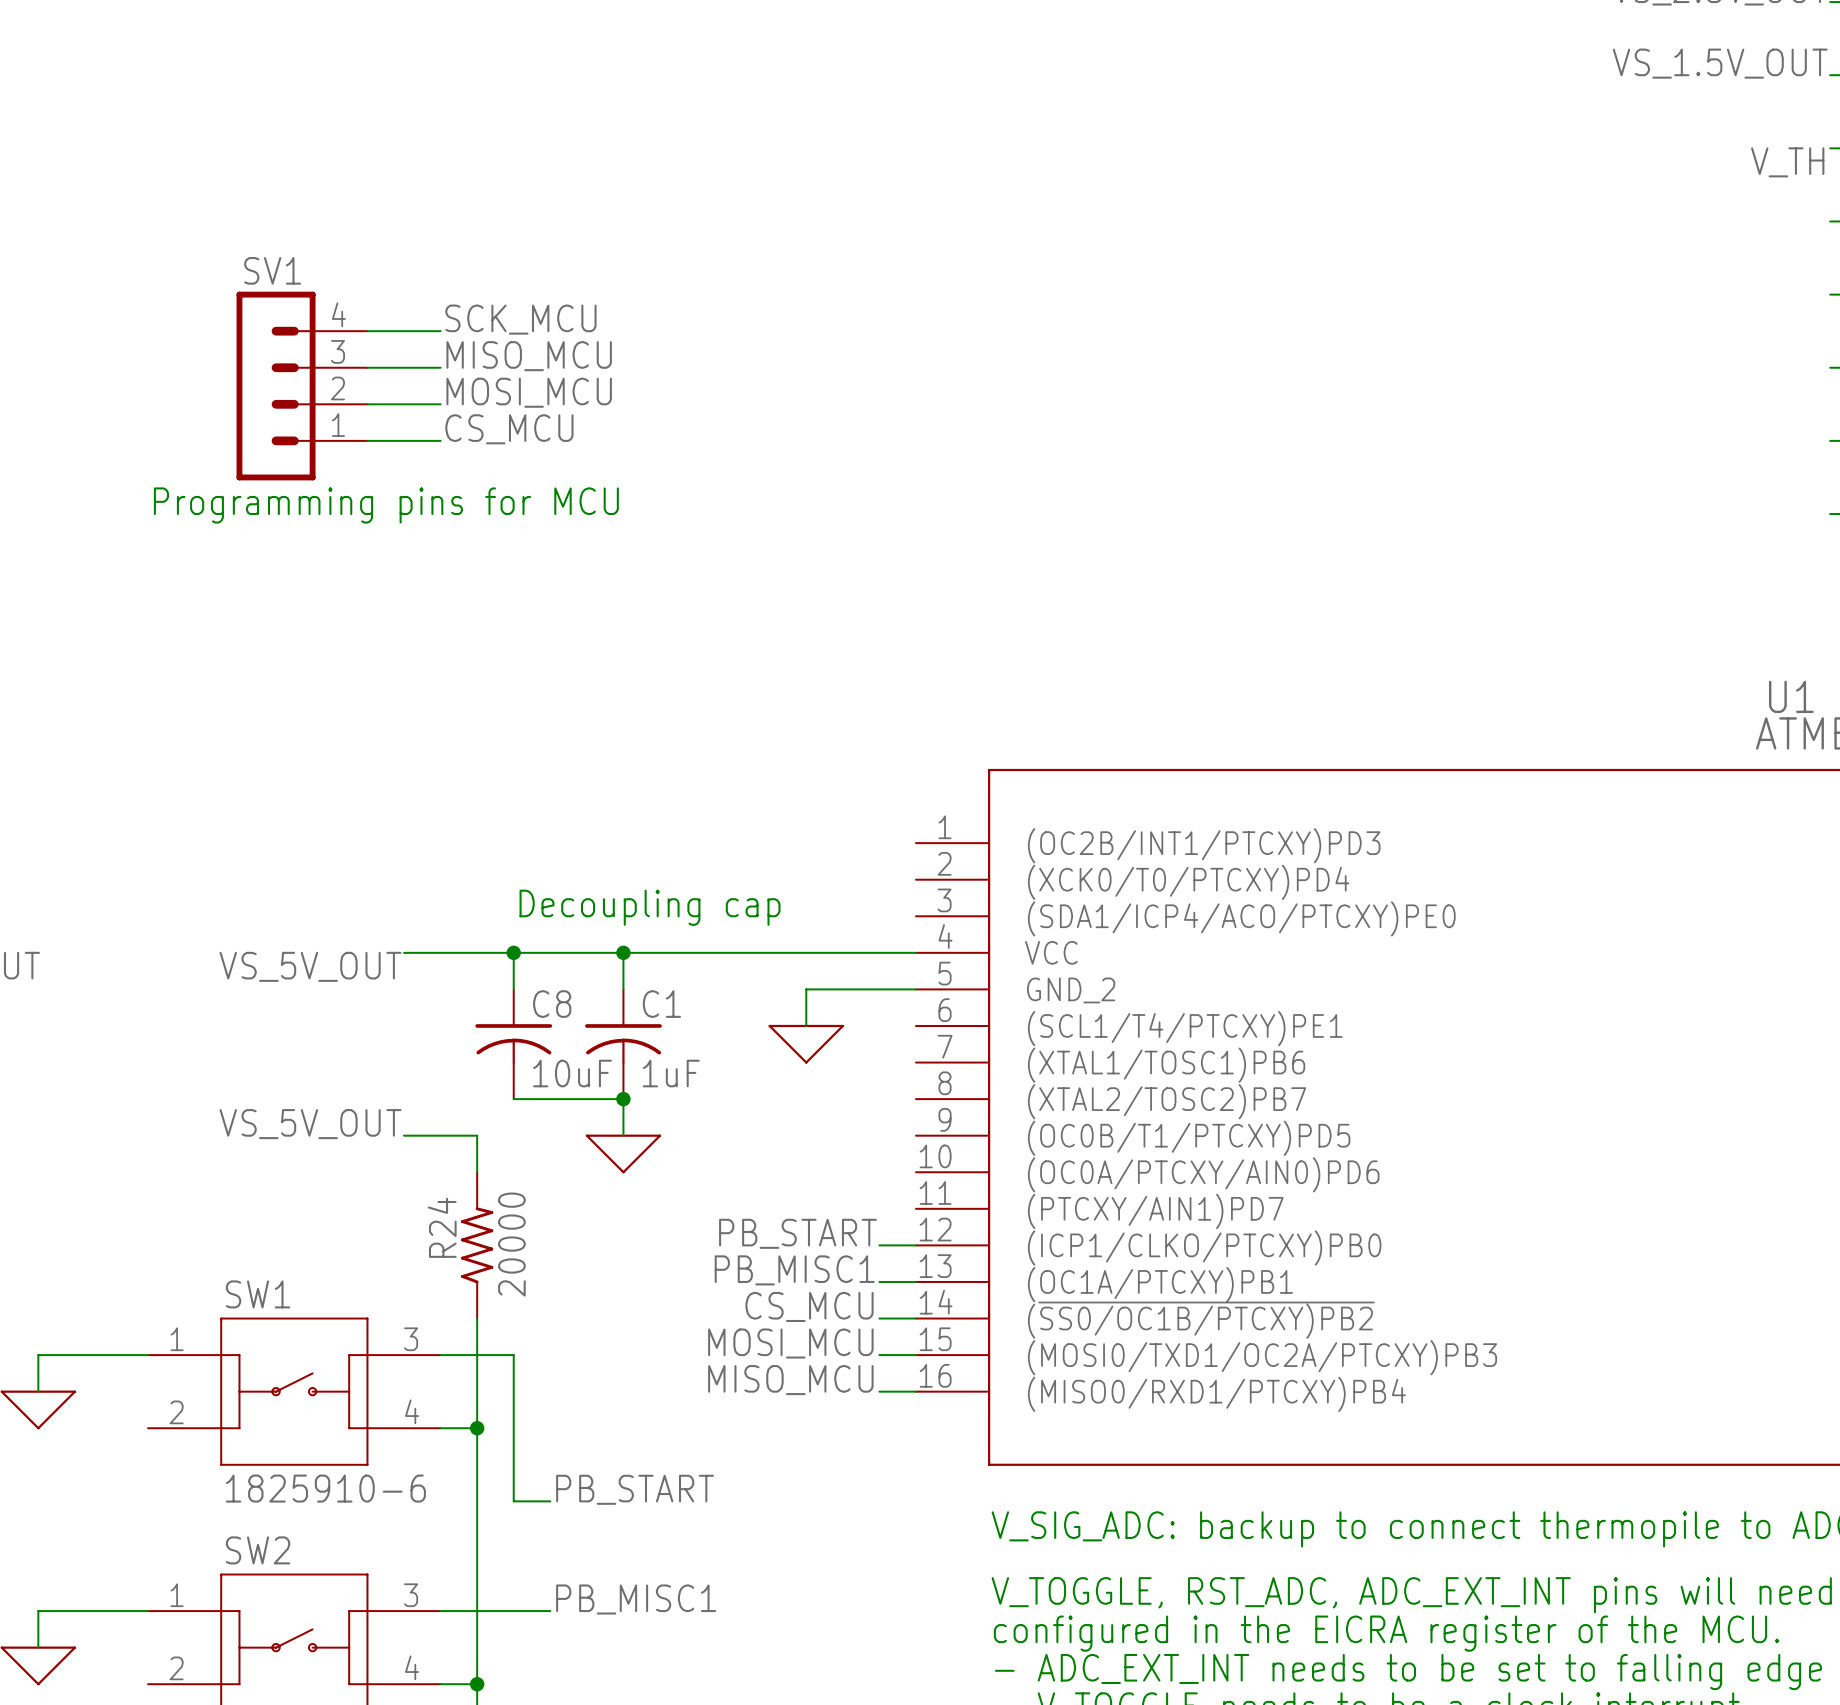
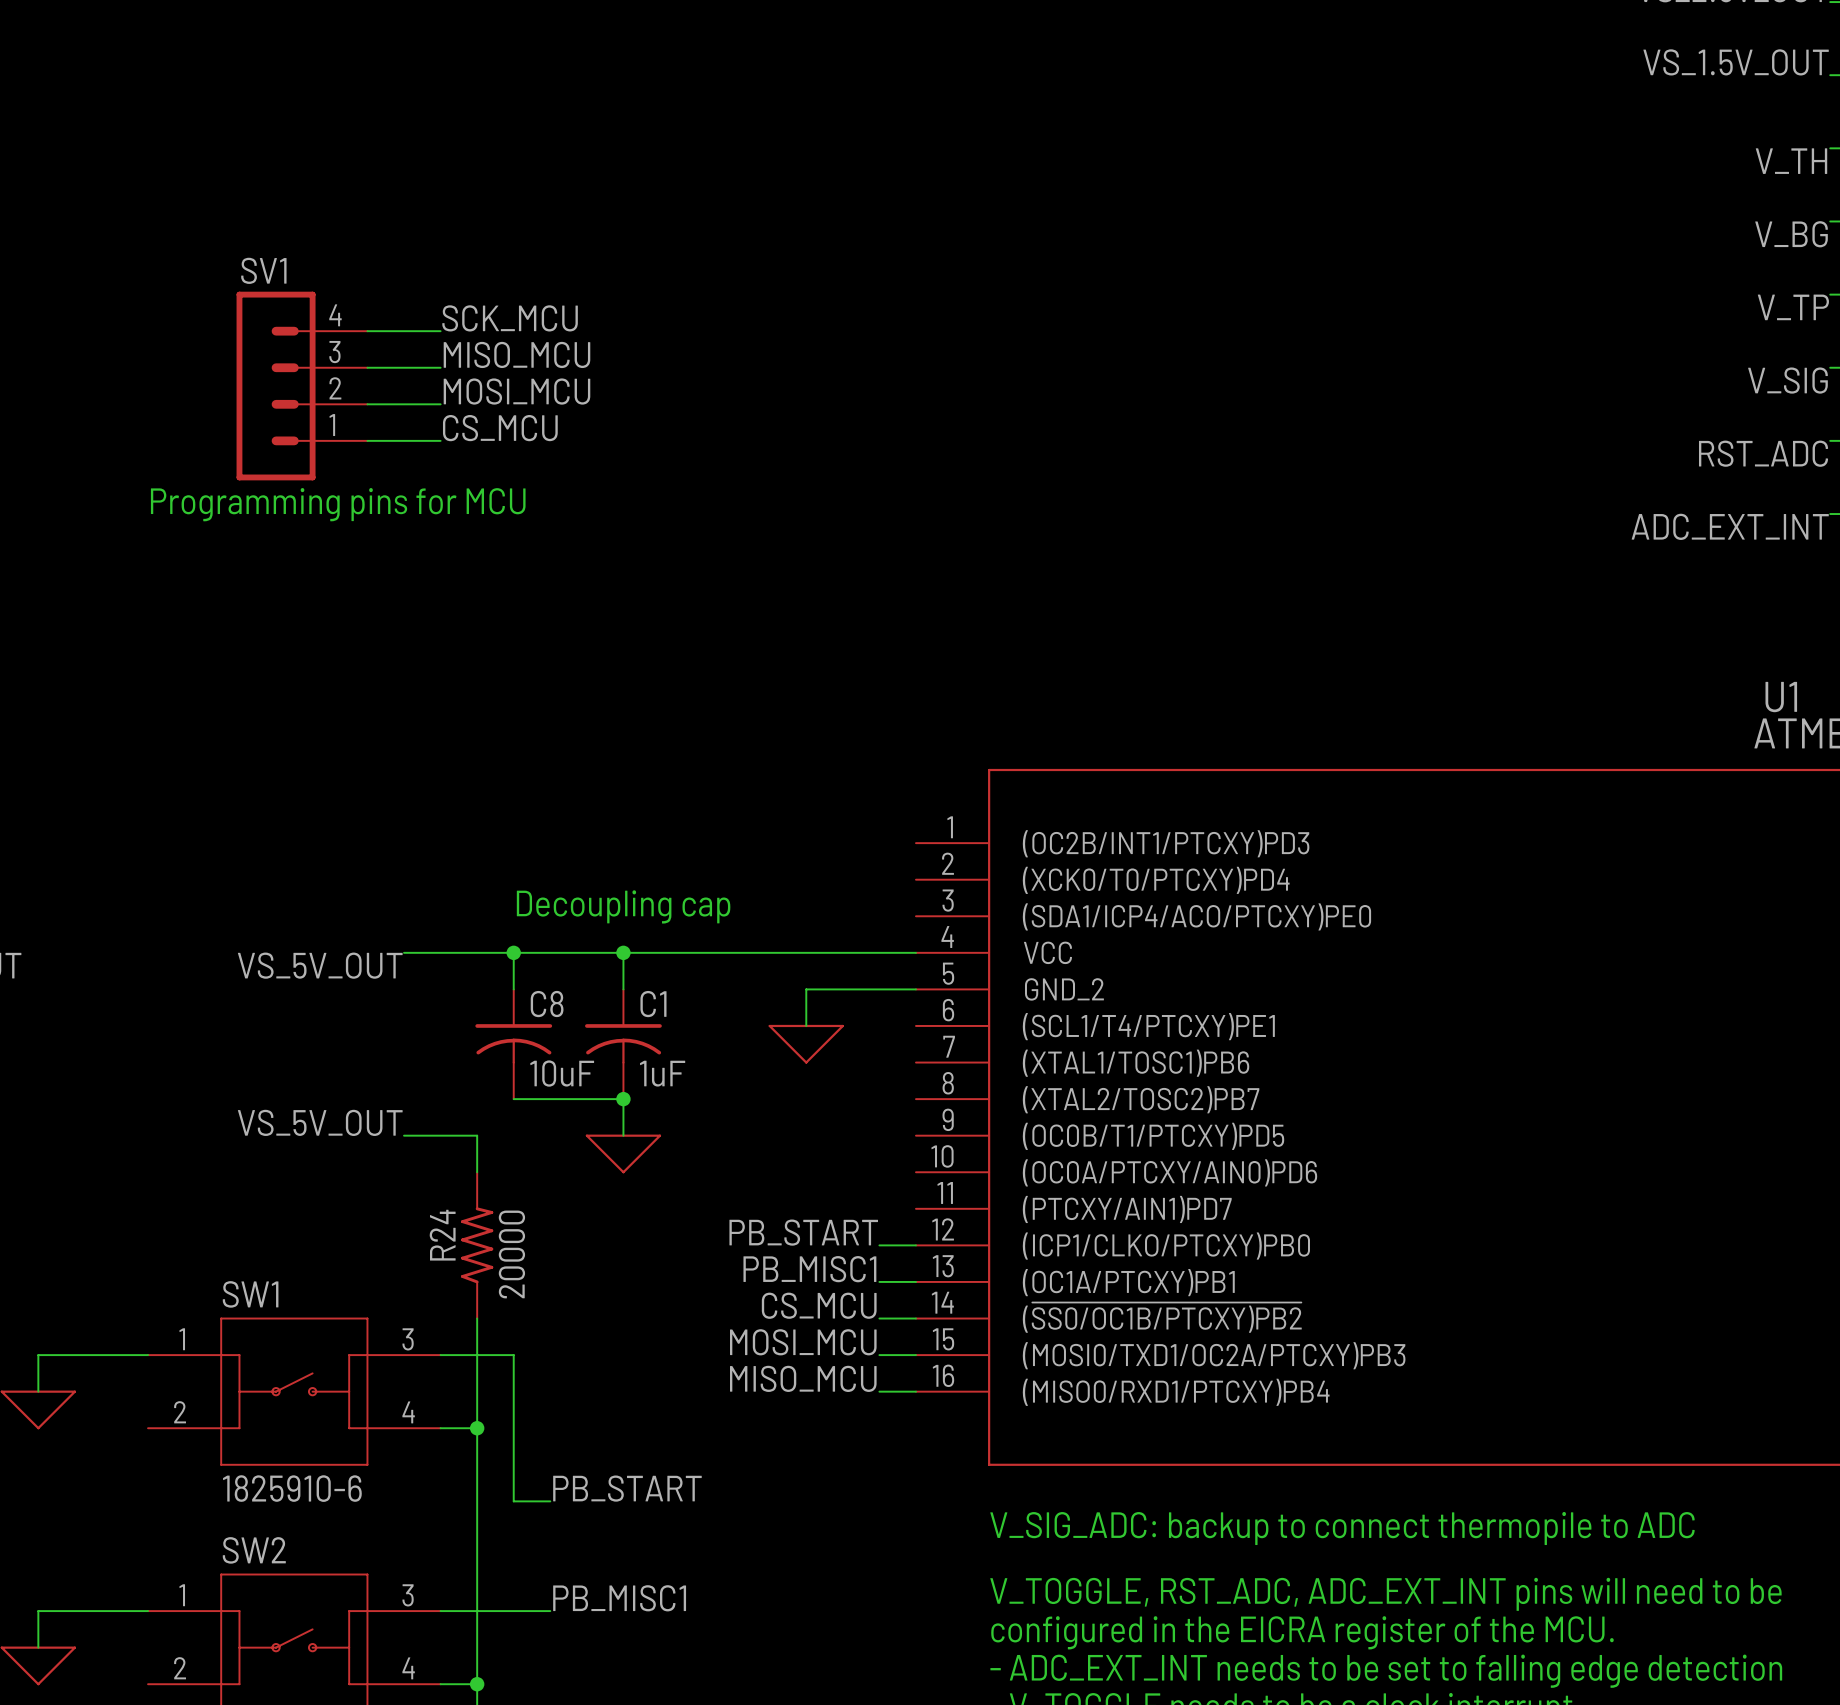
label: none -> V_BG (1791, 234)
label: none -> V_TP (1793, 307)
label: none -> V_SIG (1787, 380)
label: none -> RST_ADC (1763, 453)
label: none -> ADC_EXT_INT (1730, 526)

